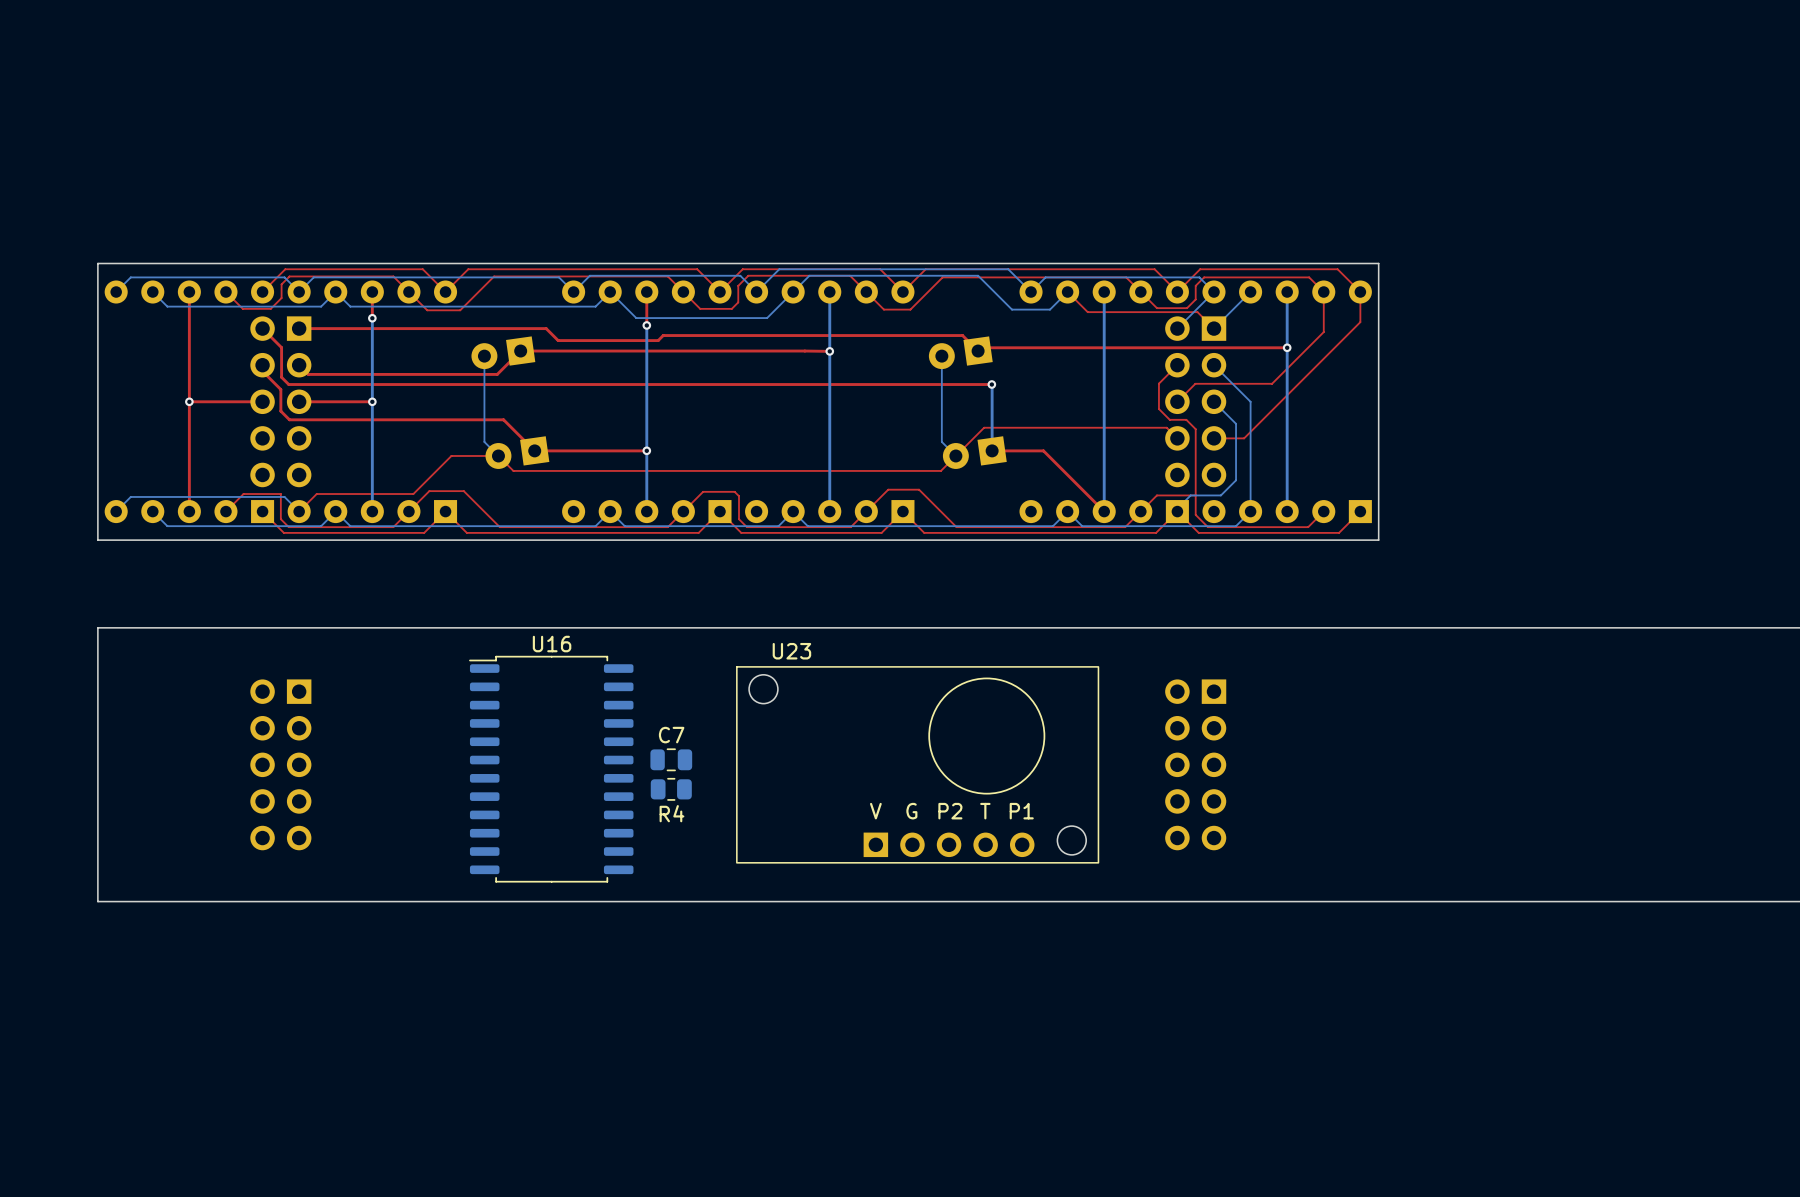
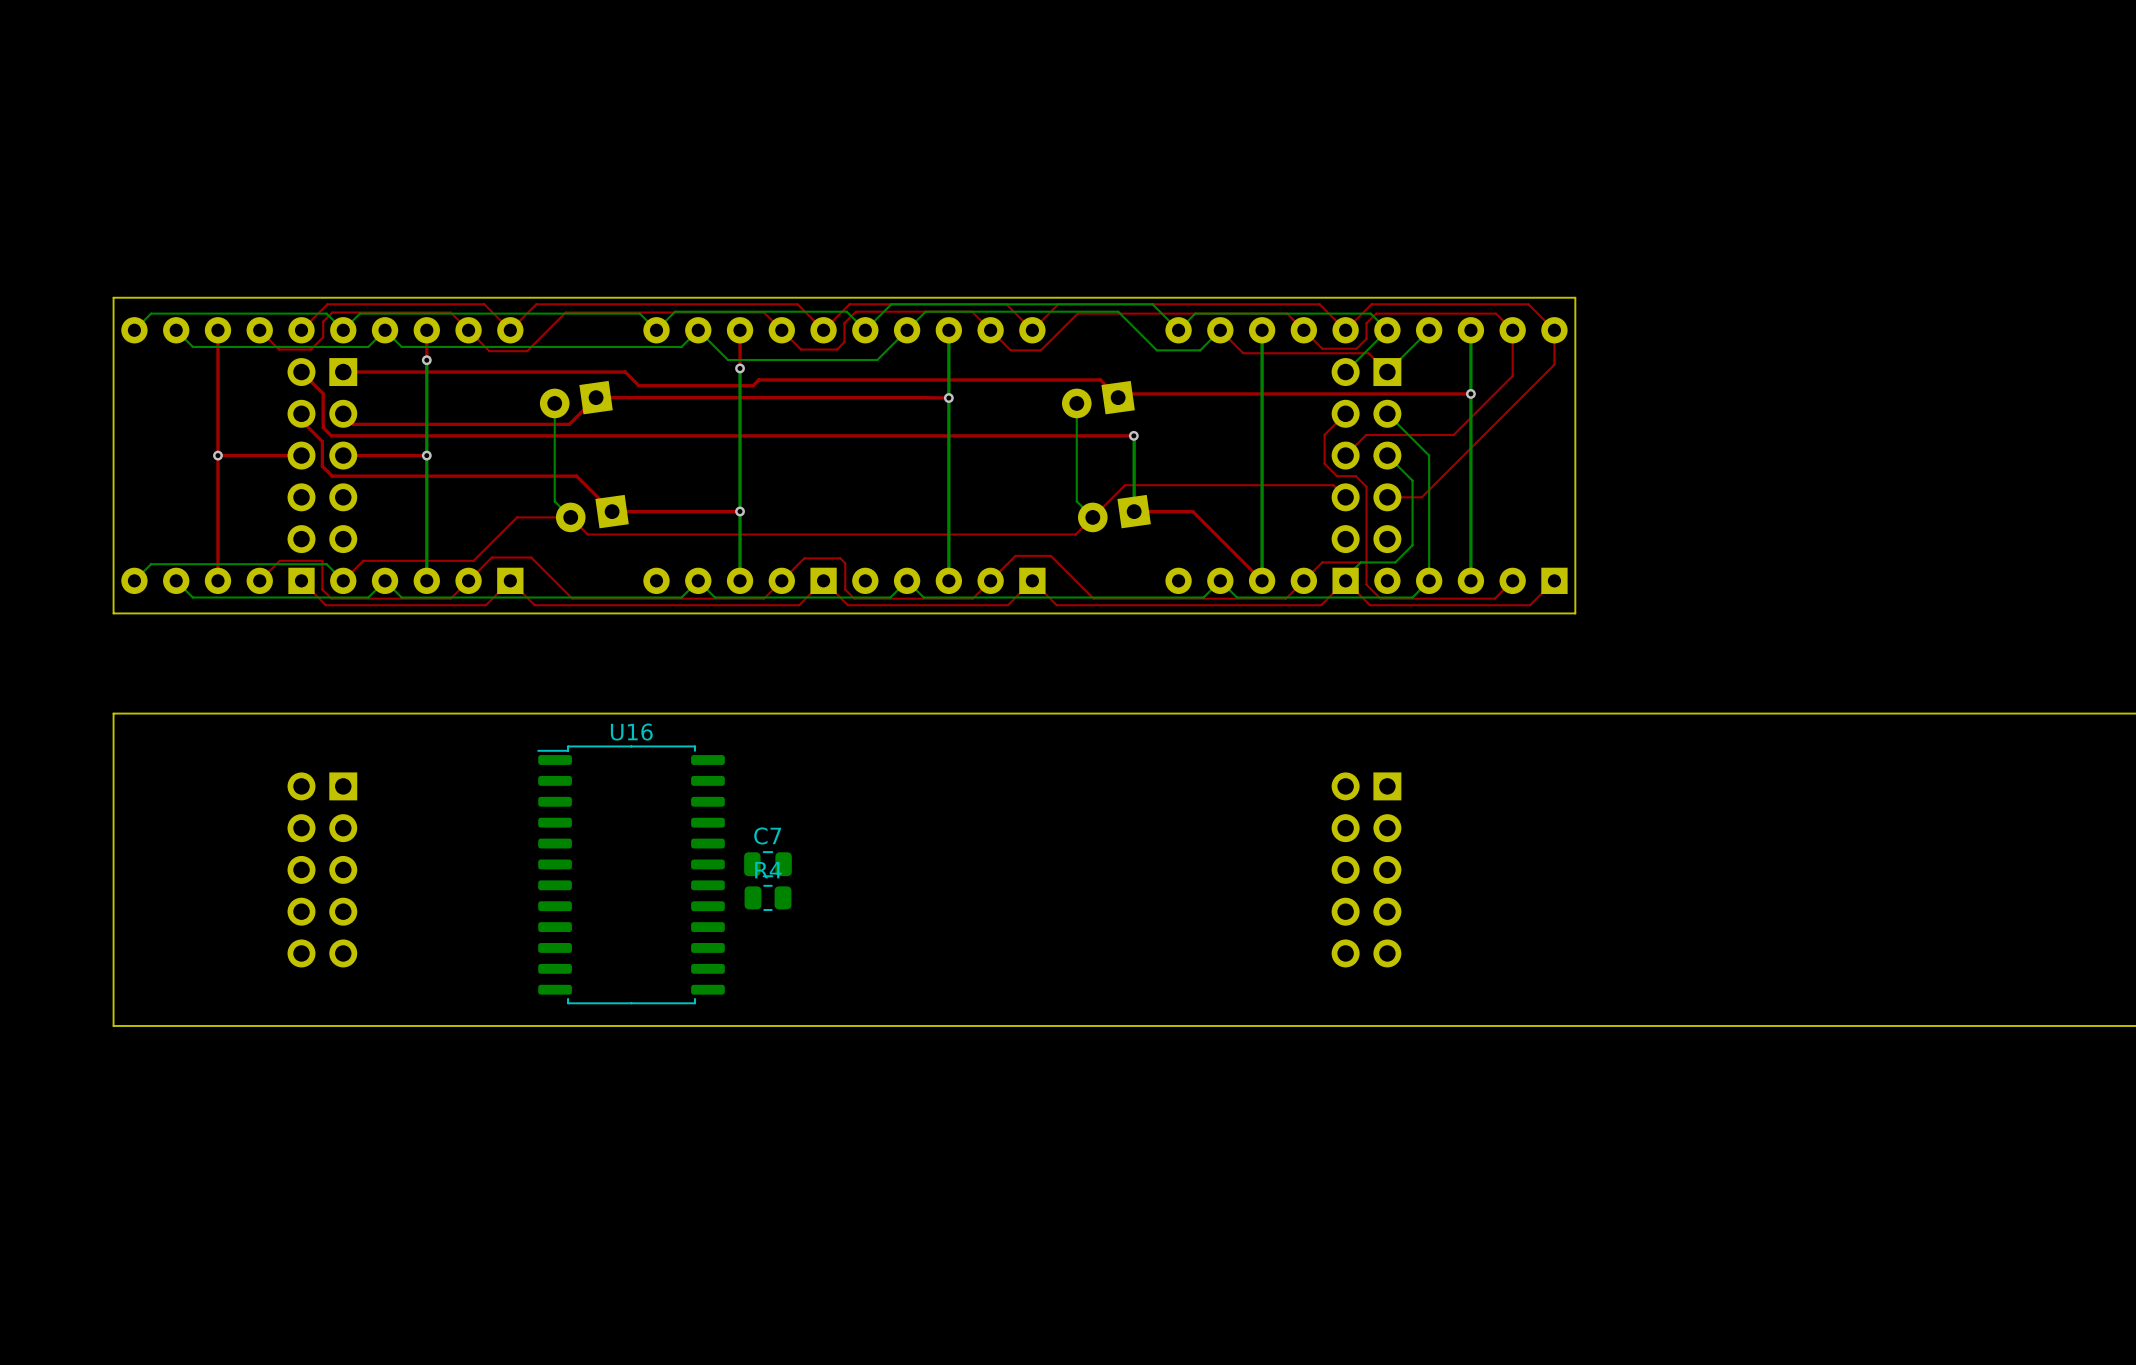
U23: (917, 764) -> none
R4 name position: R4 (671, 813) -> R4 (768, 870)

